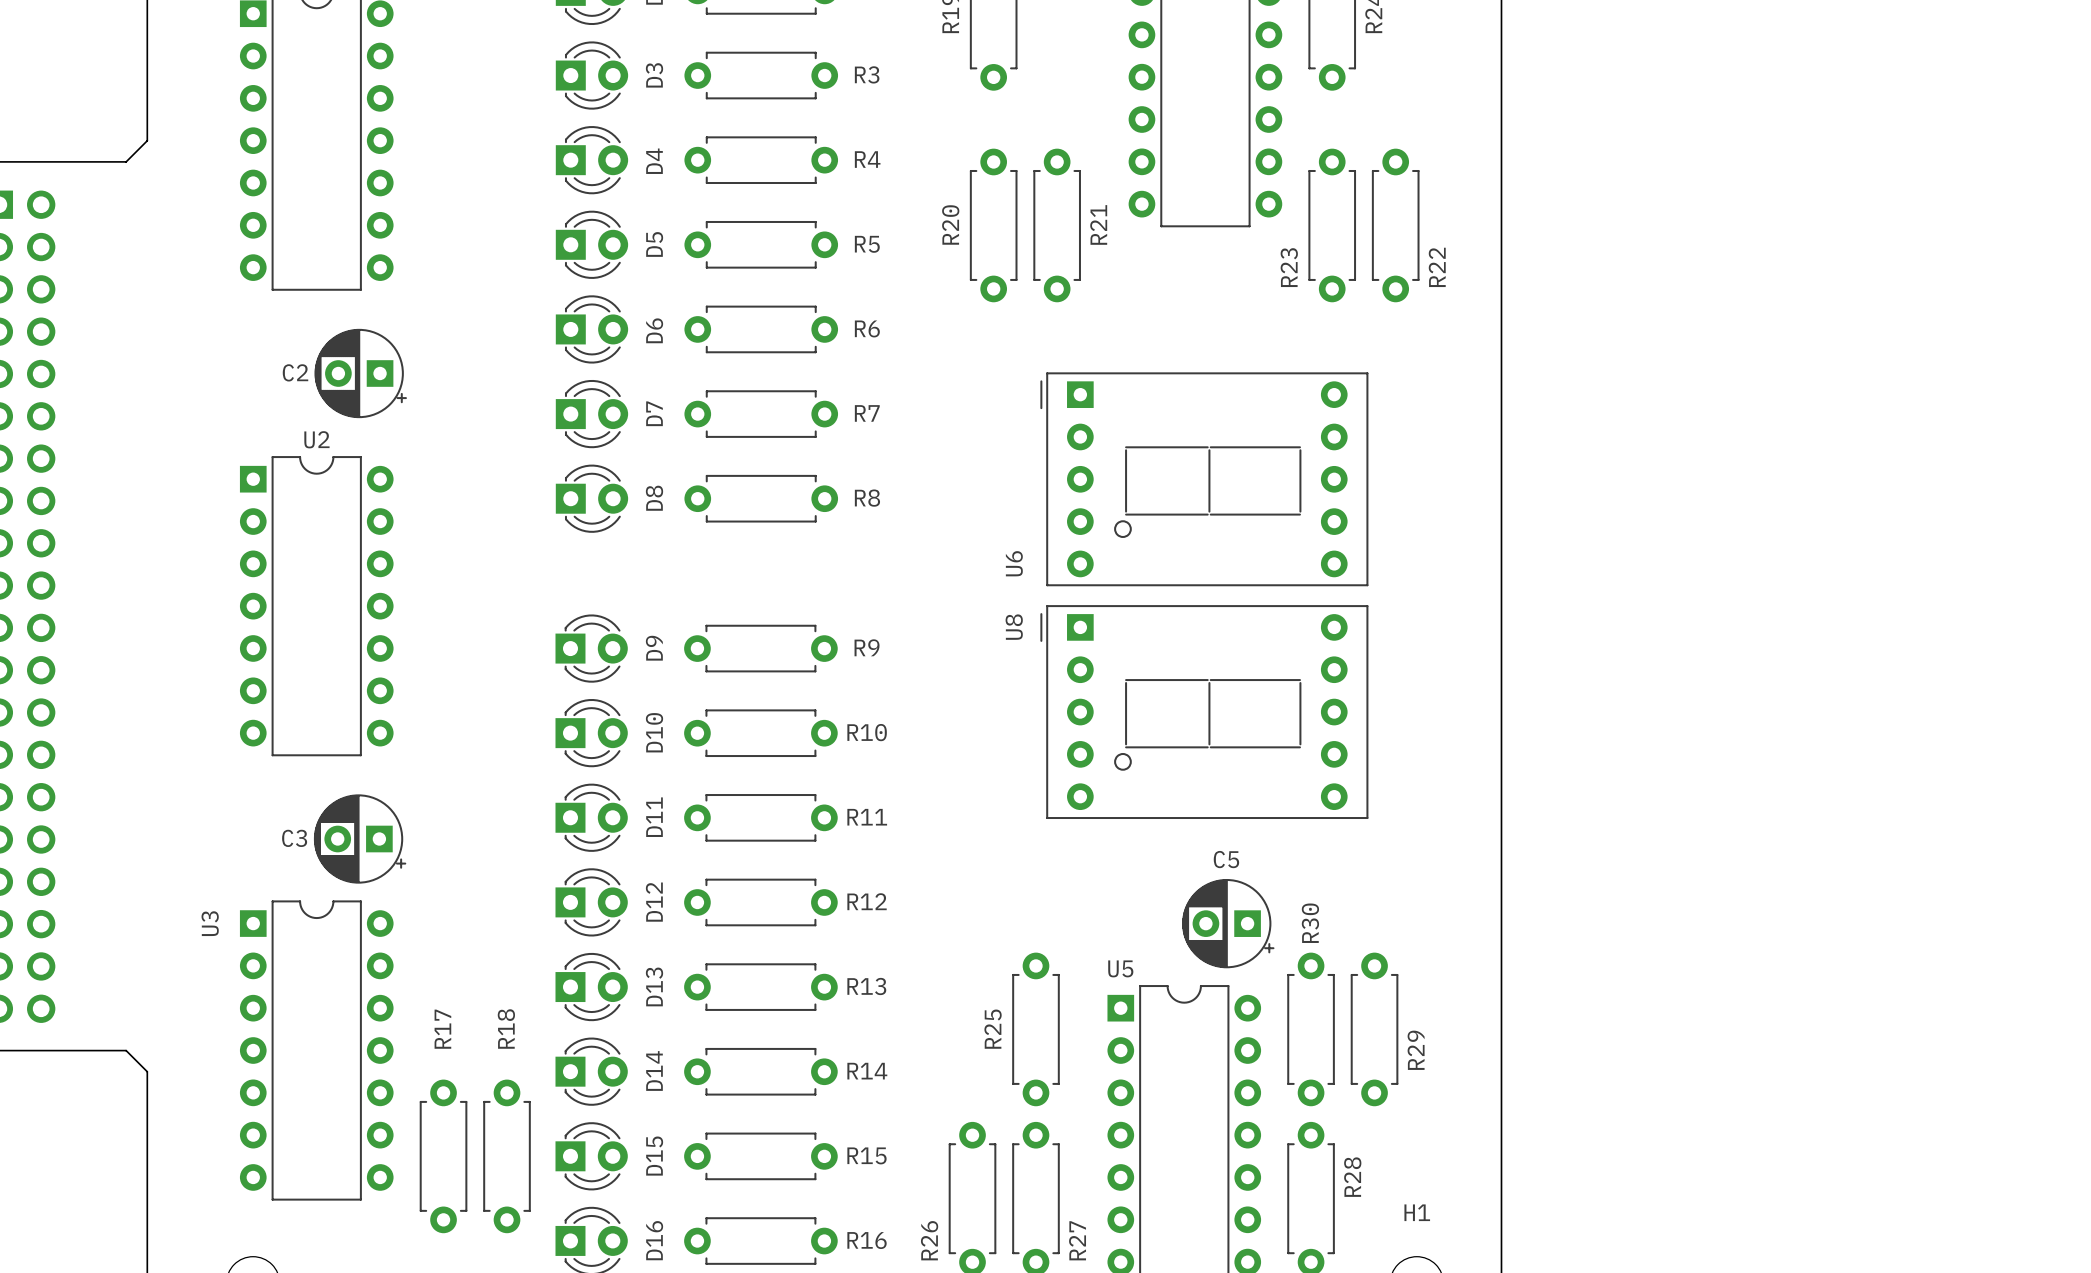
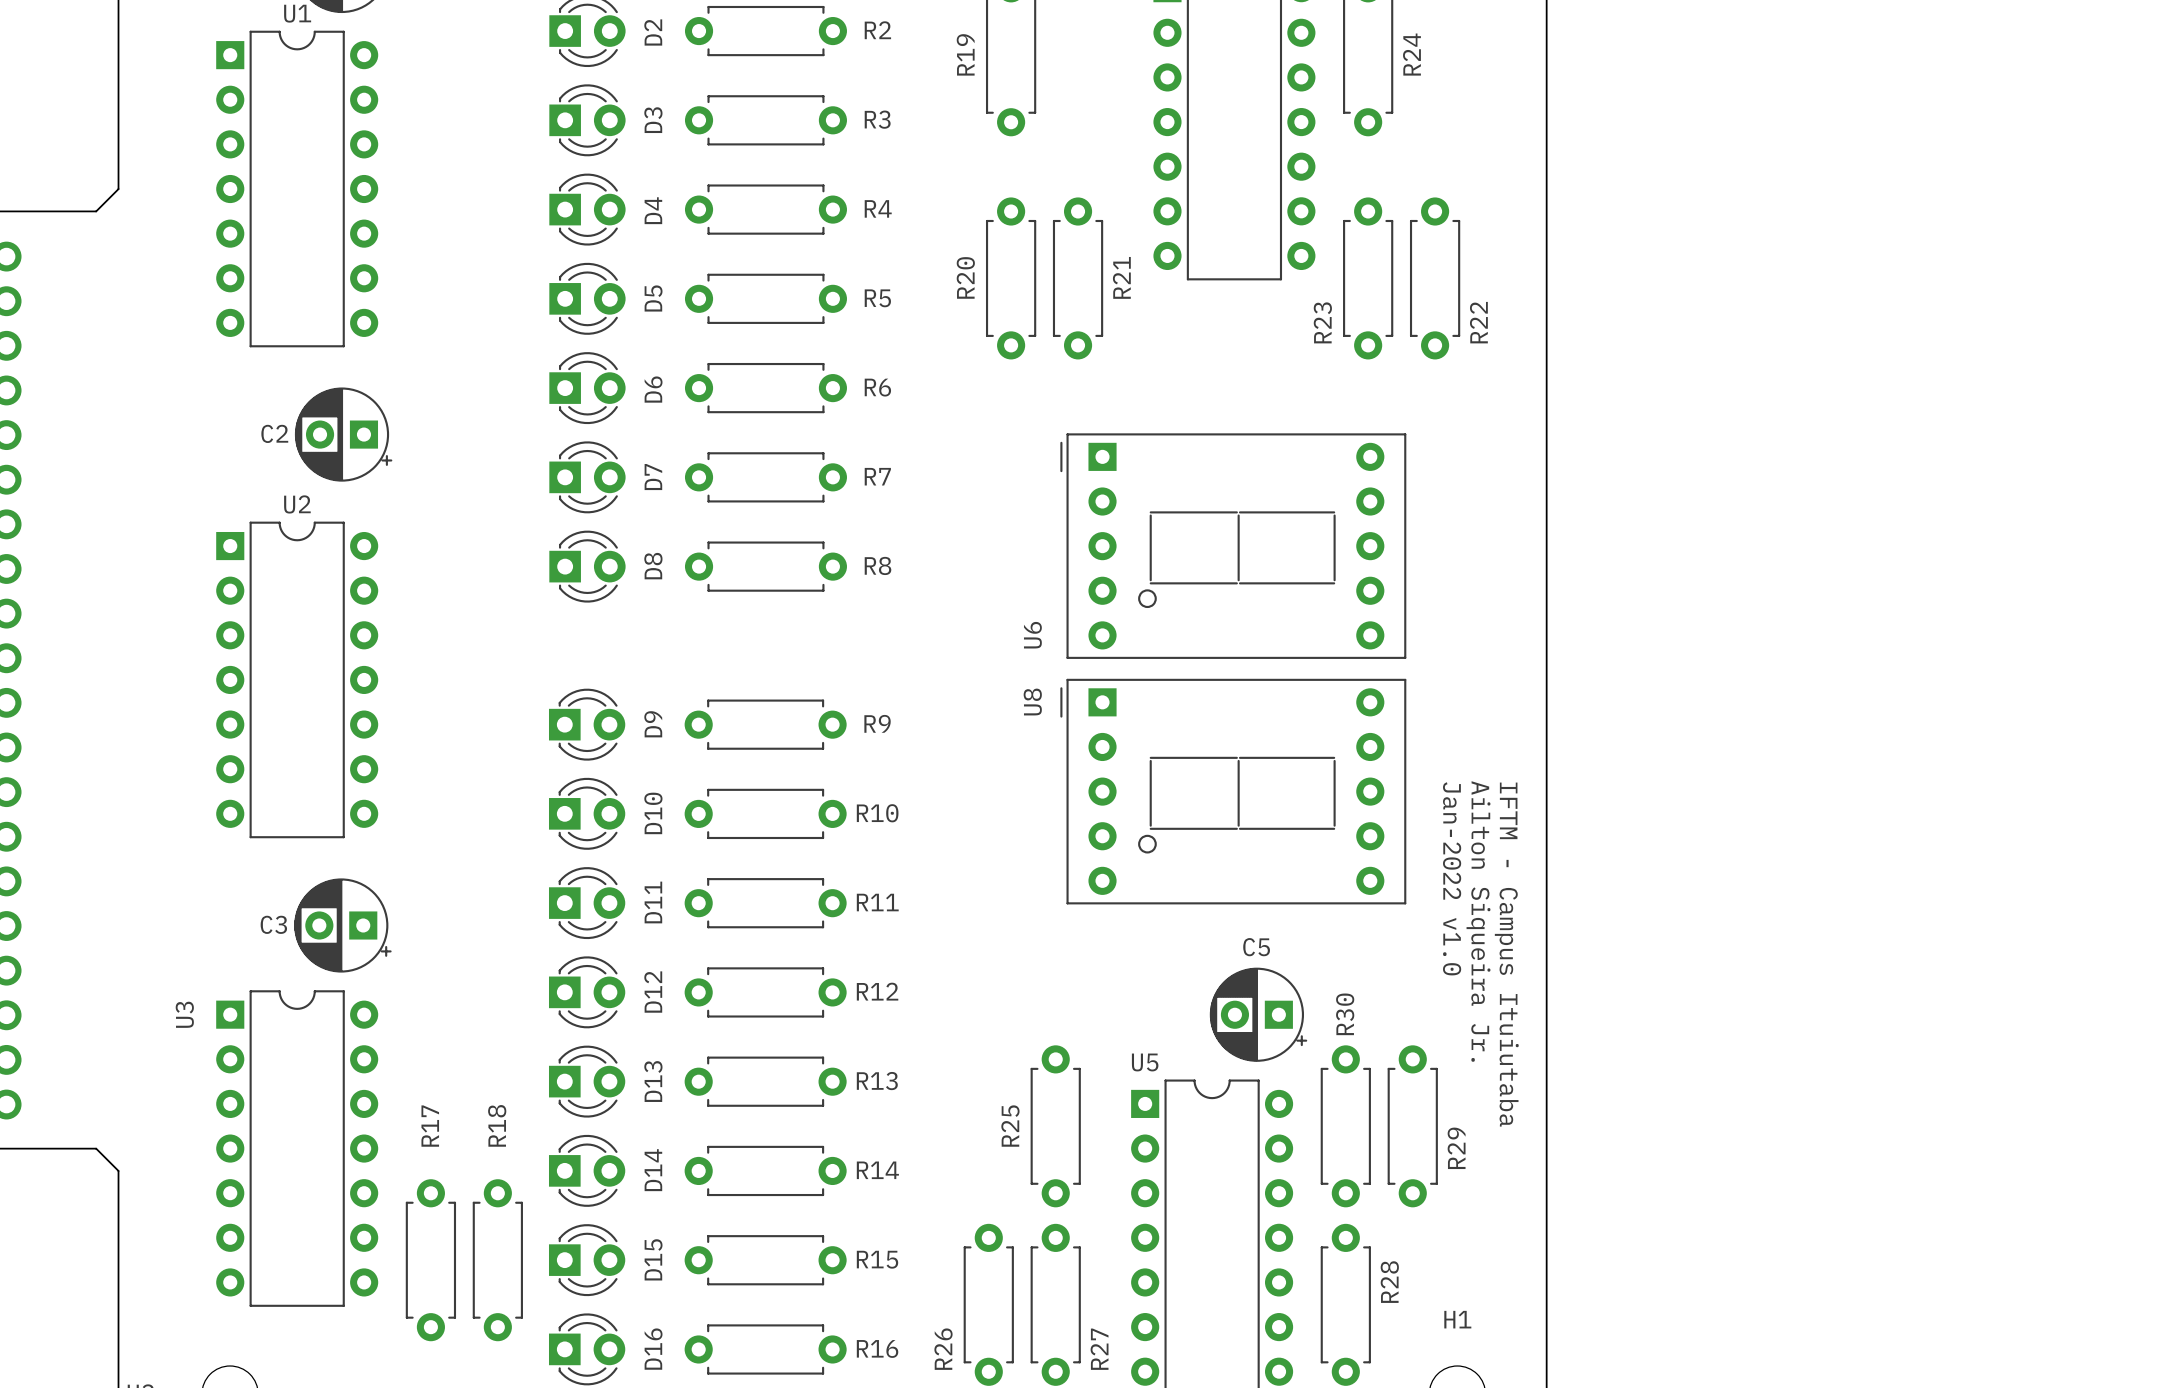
text: none -> Jan-2022 v1.0 (1452, 878)
text: none -> Ailton Siqueira Jr. (1478, 921)
text: none -> IFTM - Campus Ituiutaba (1506, 954)

